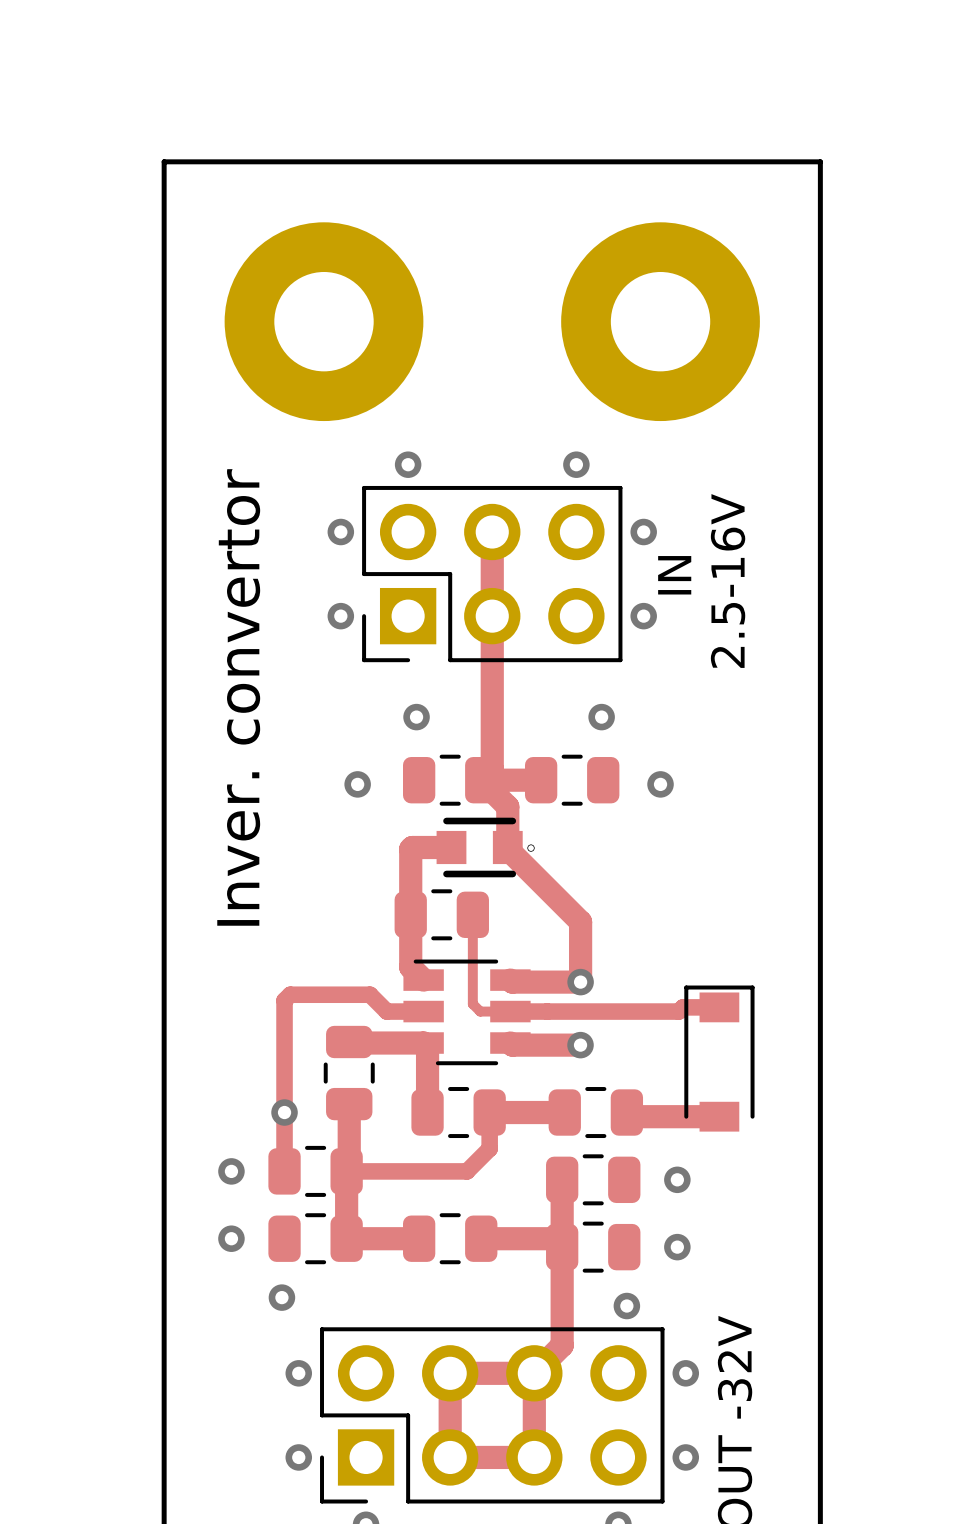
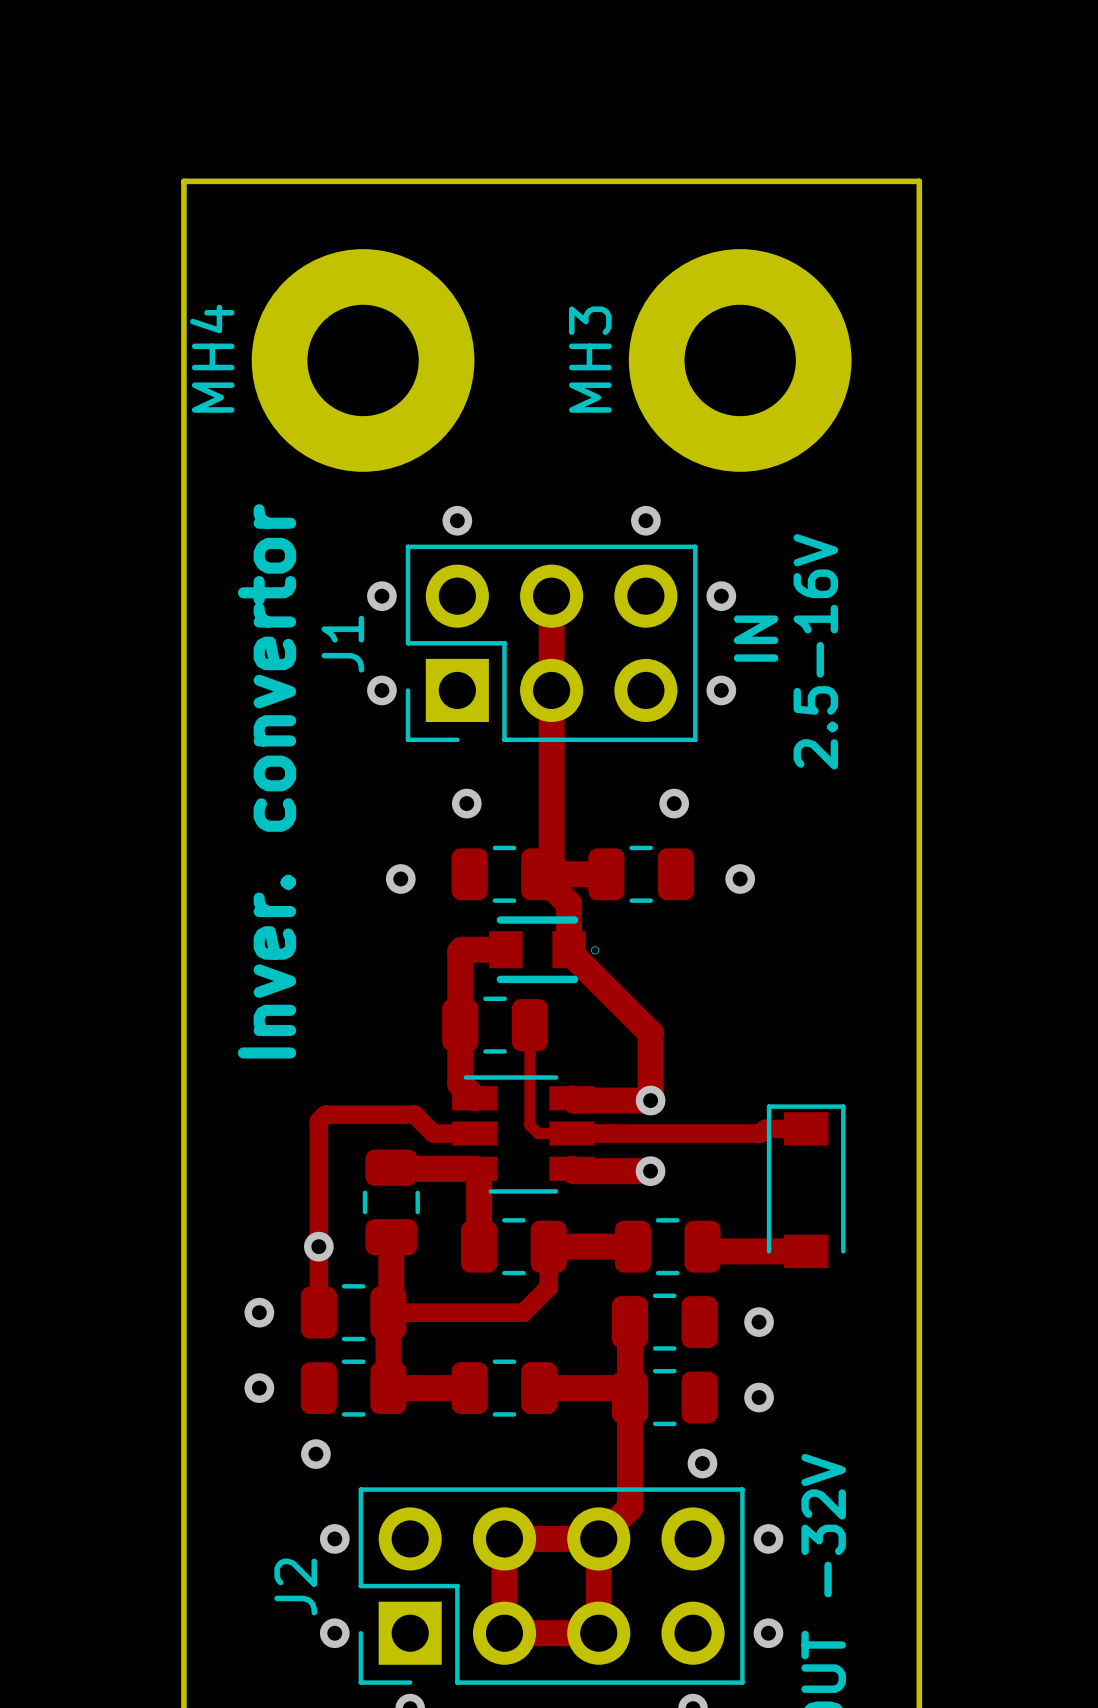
MH4 name: none -> MH4 (212, 358)
MH3 name: none -> MH3 (590, 359)
J1 name: none -> J1 (342, 644)
J2 name: none -> J2 (295, 1586)

